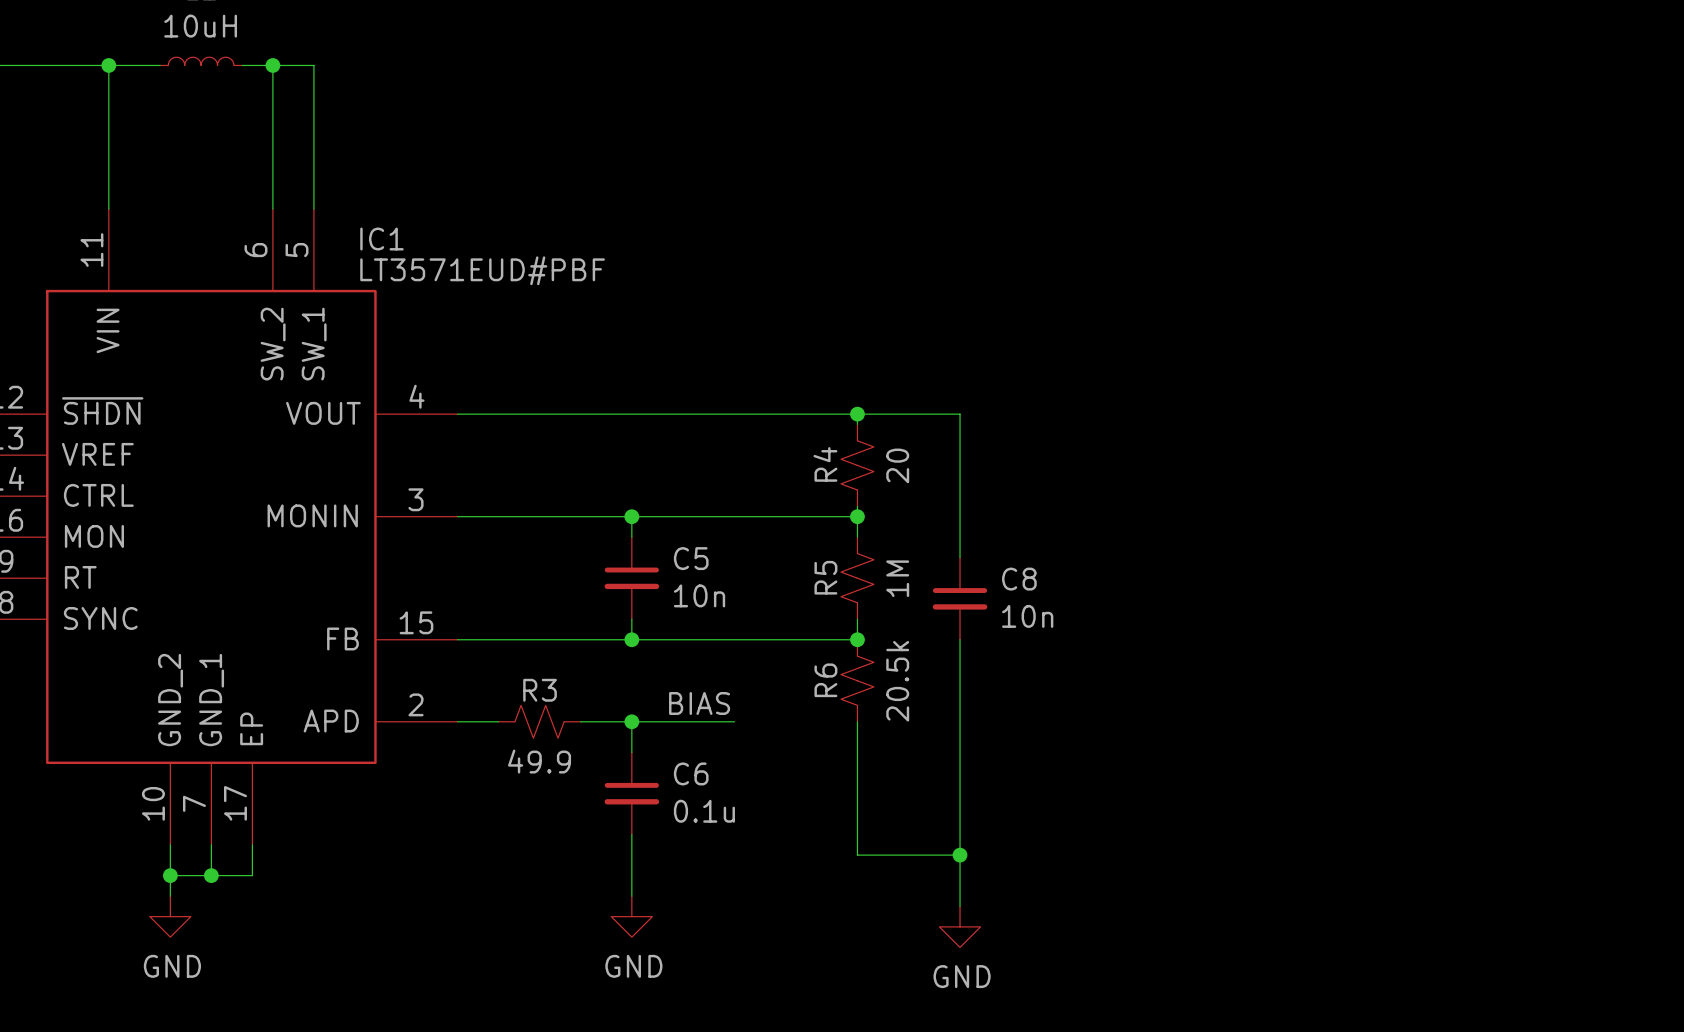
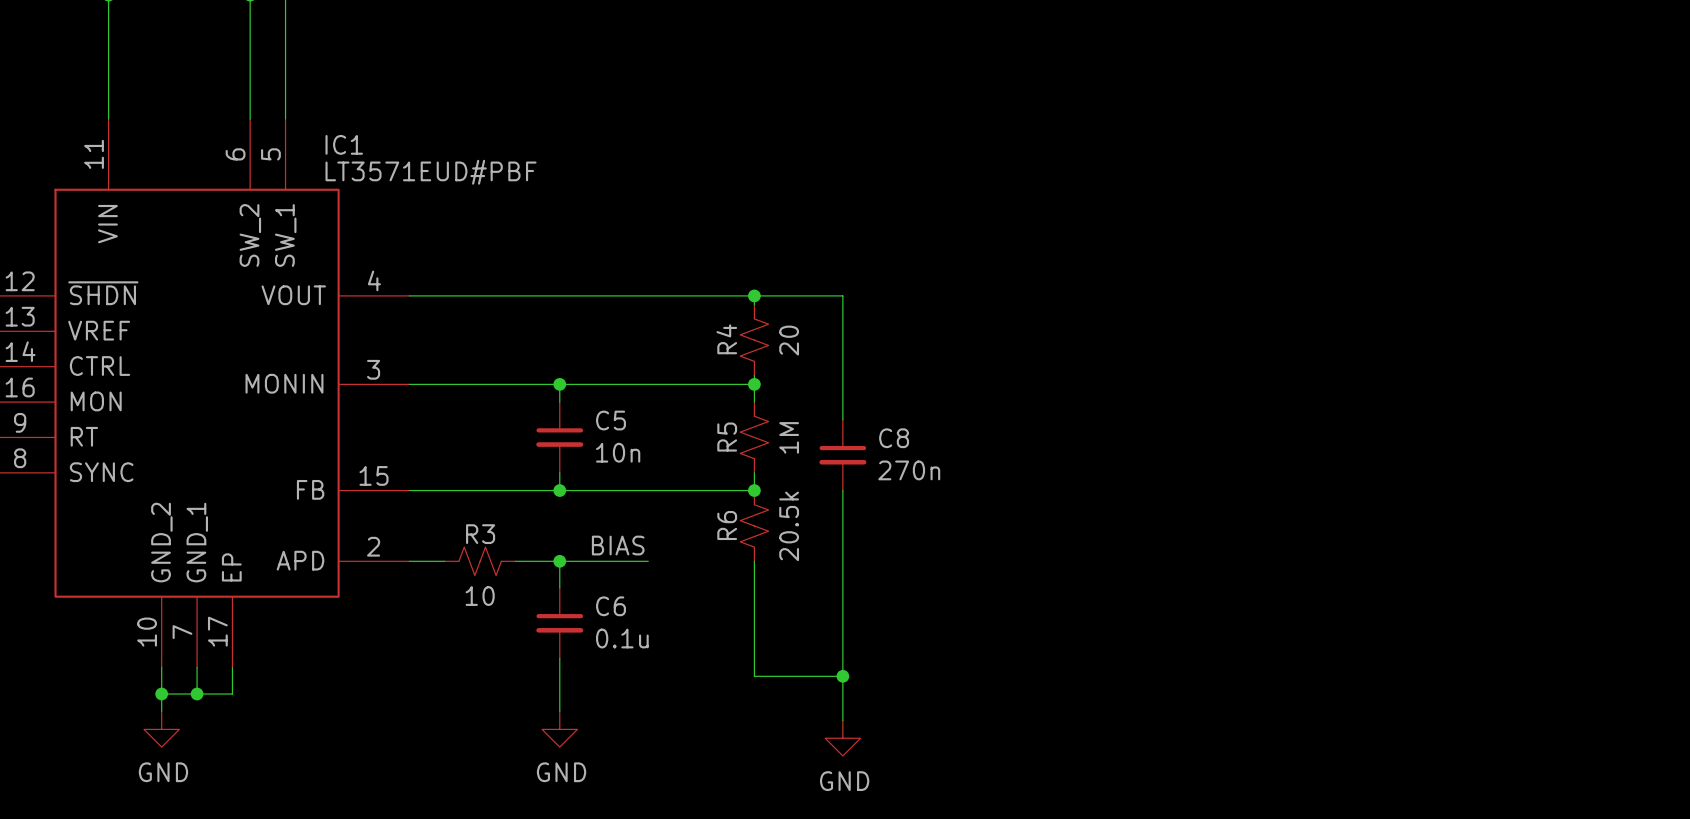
C8 value: 10n (1027, 616) -> 270n (909, 470)
R3 value: 49.9 (539, 761) -> 10 (480, 596)

